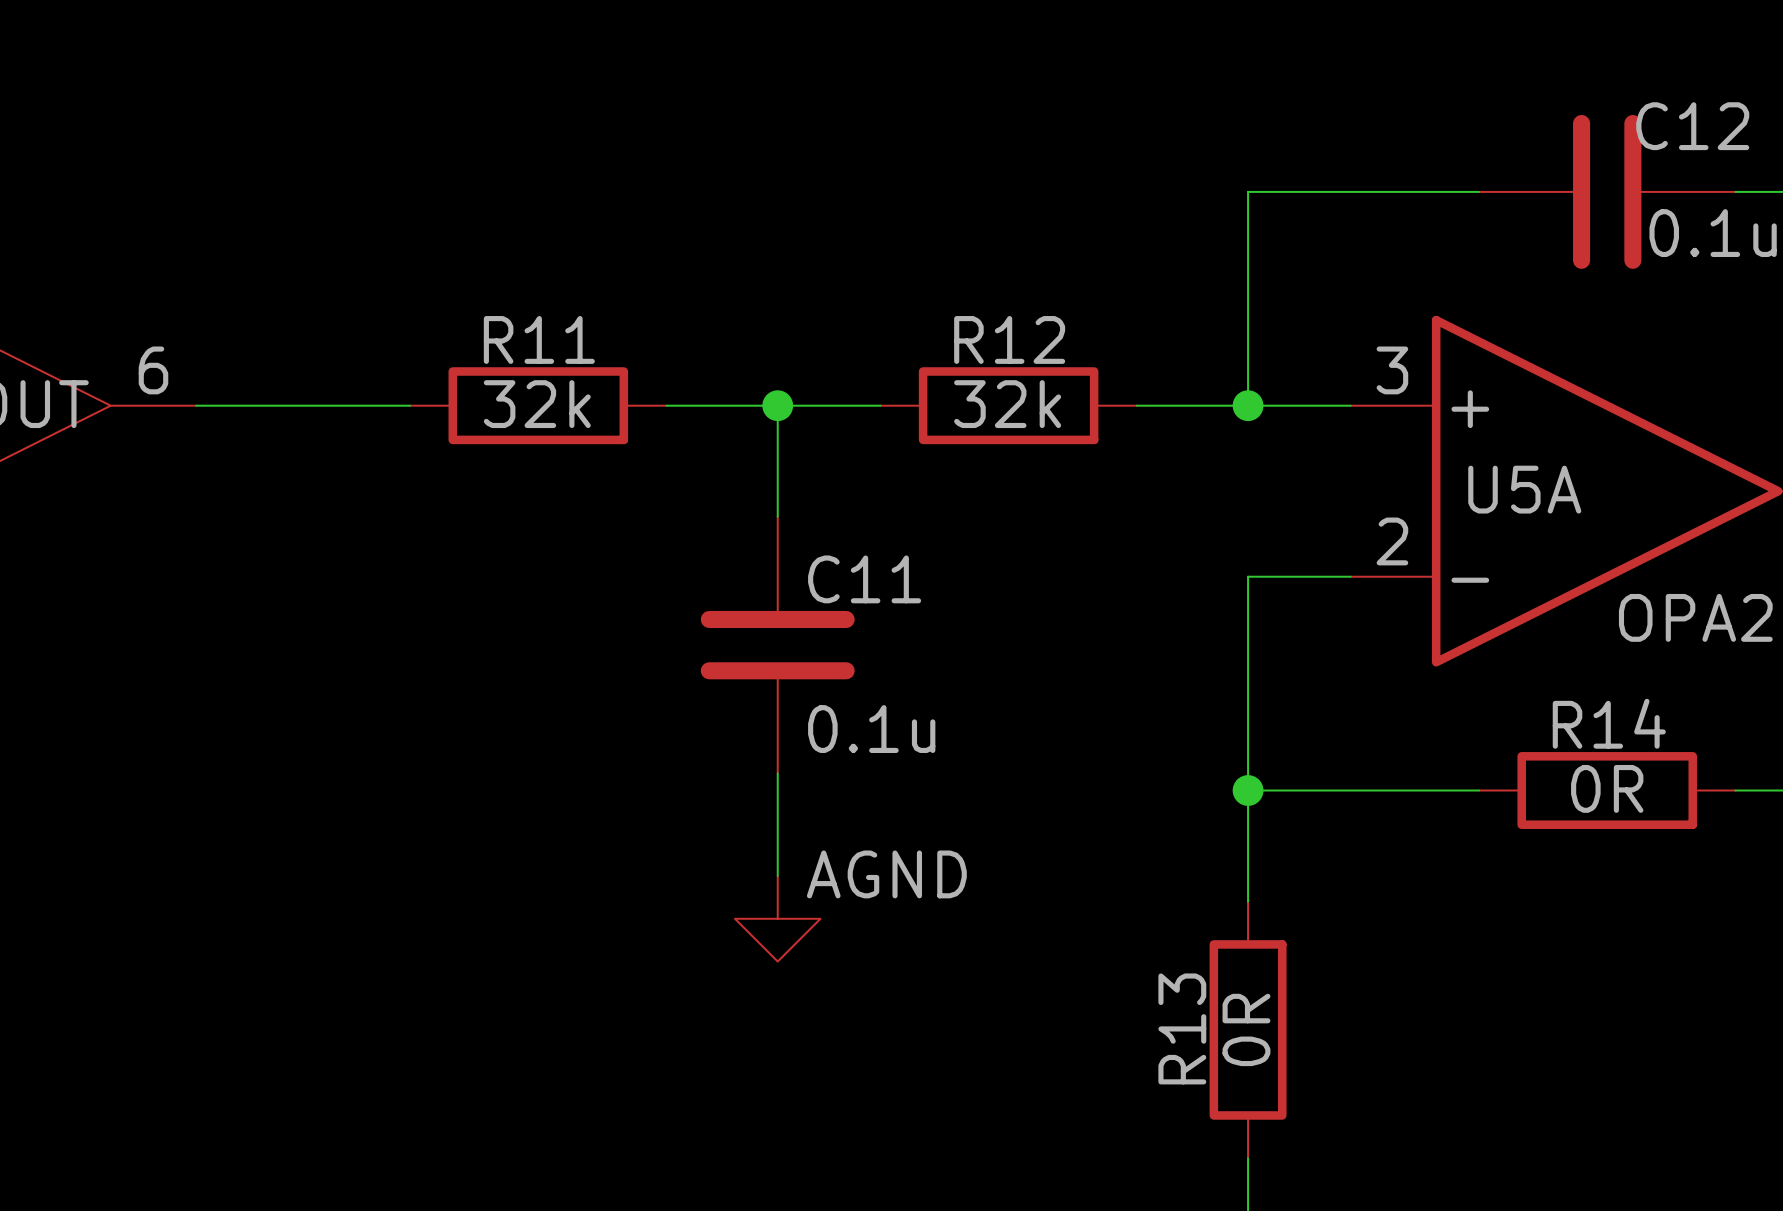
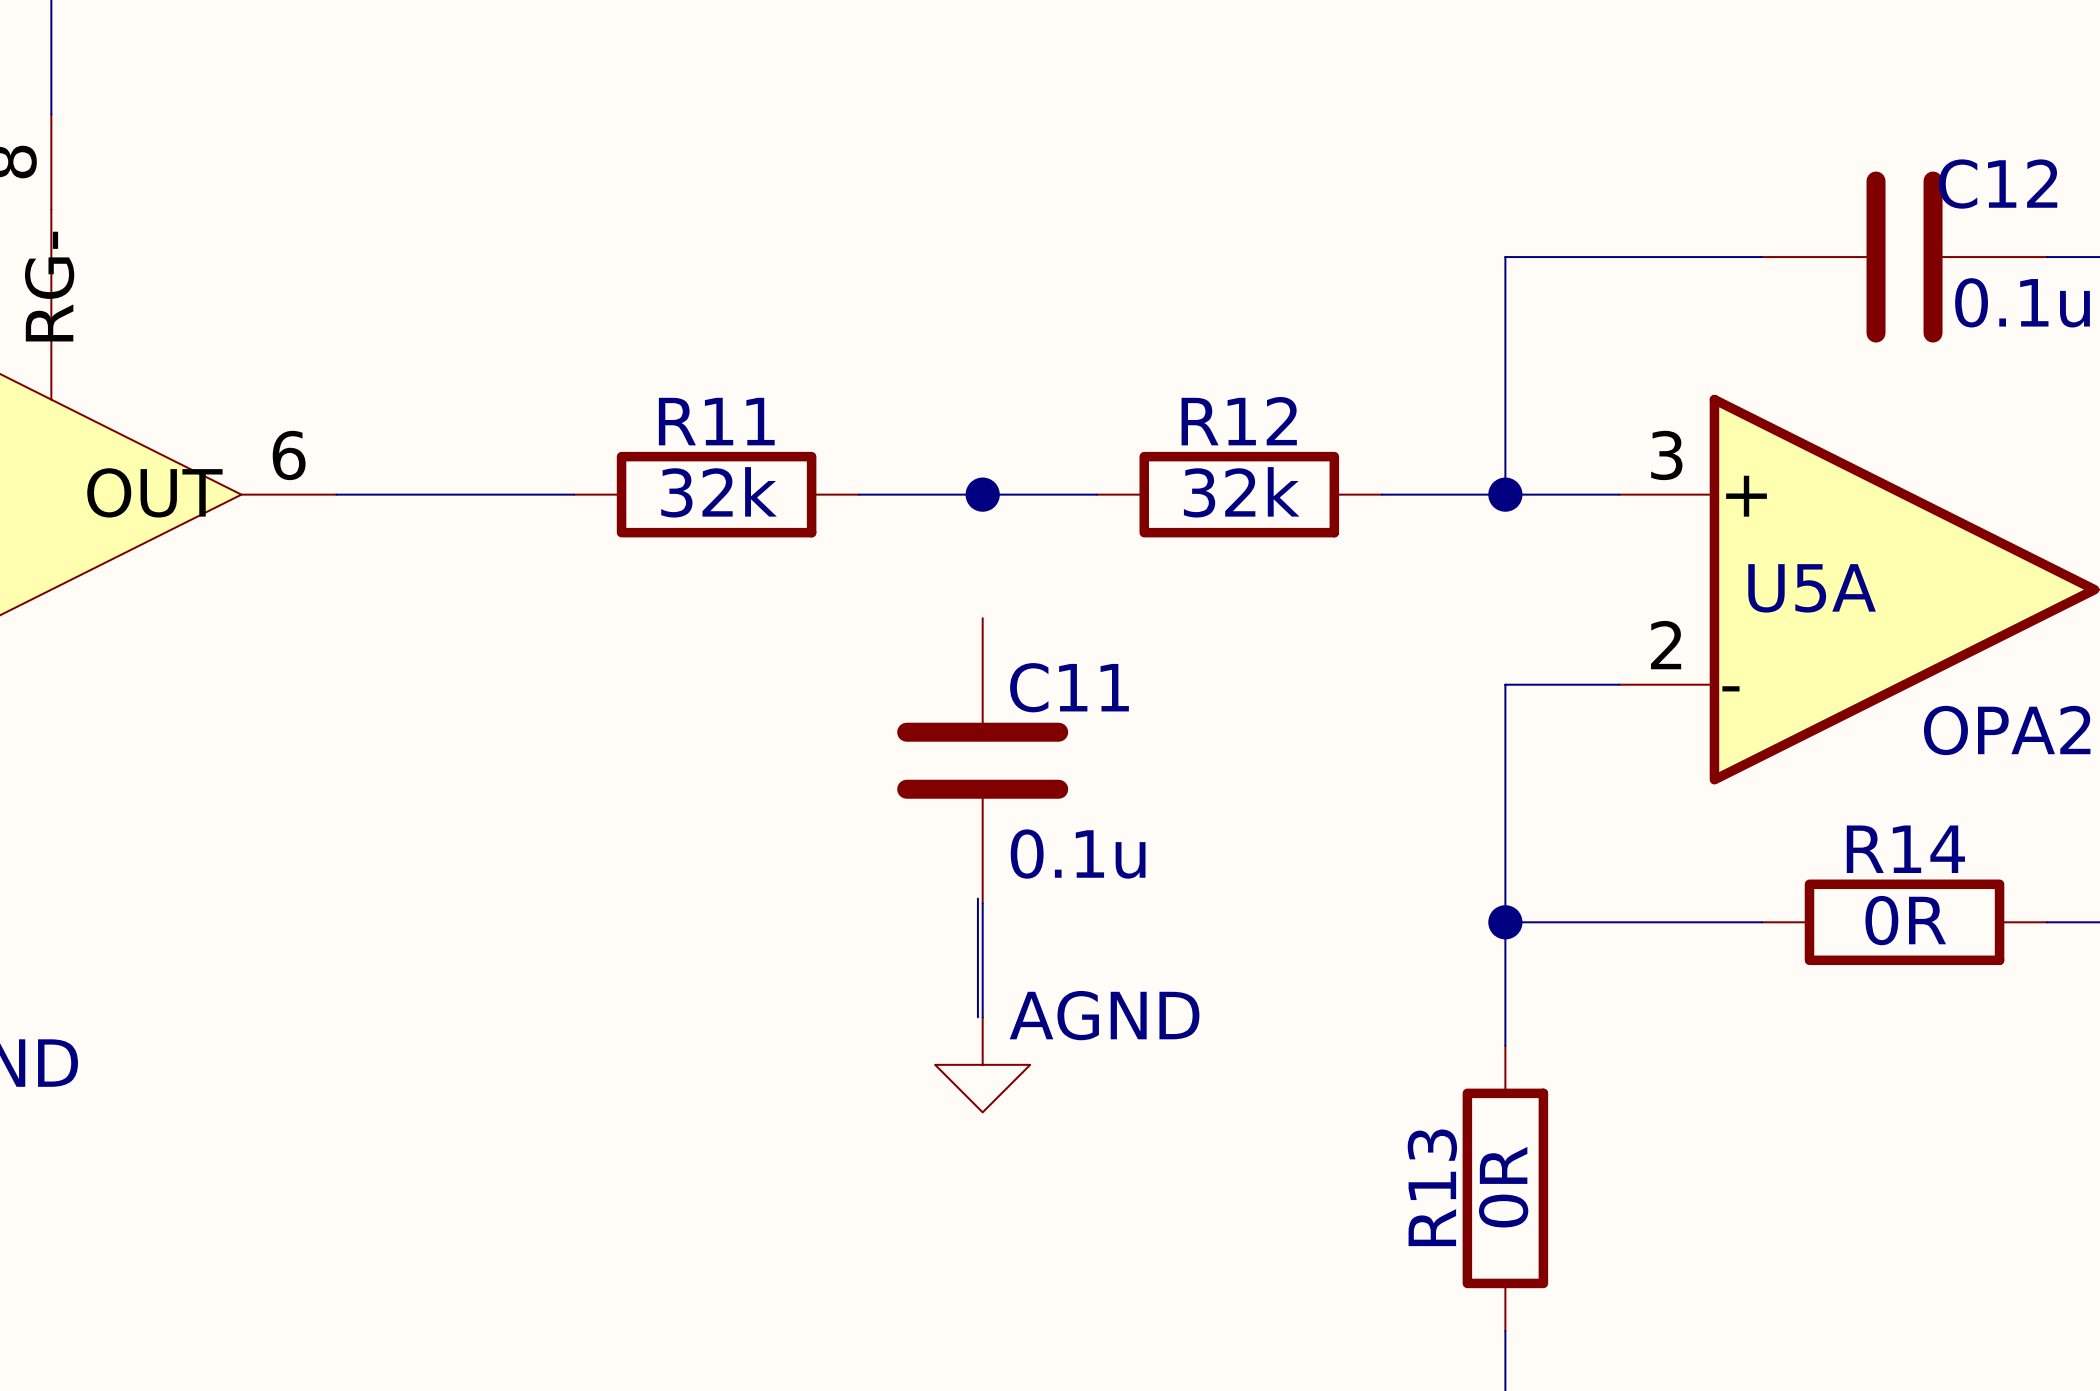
wire: (777, 405) (777, 516) -> none
wire: none -> (977, 898) (977, 1017)

